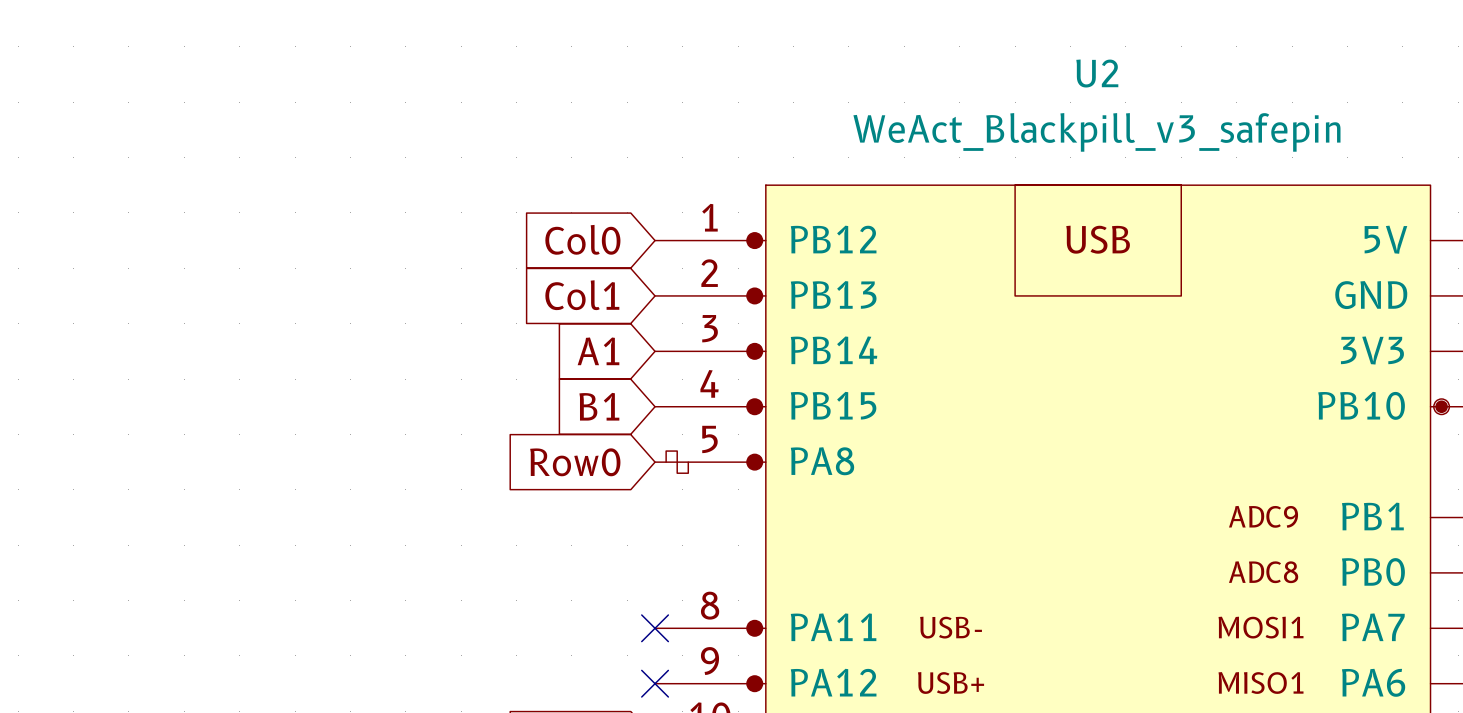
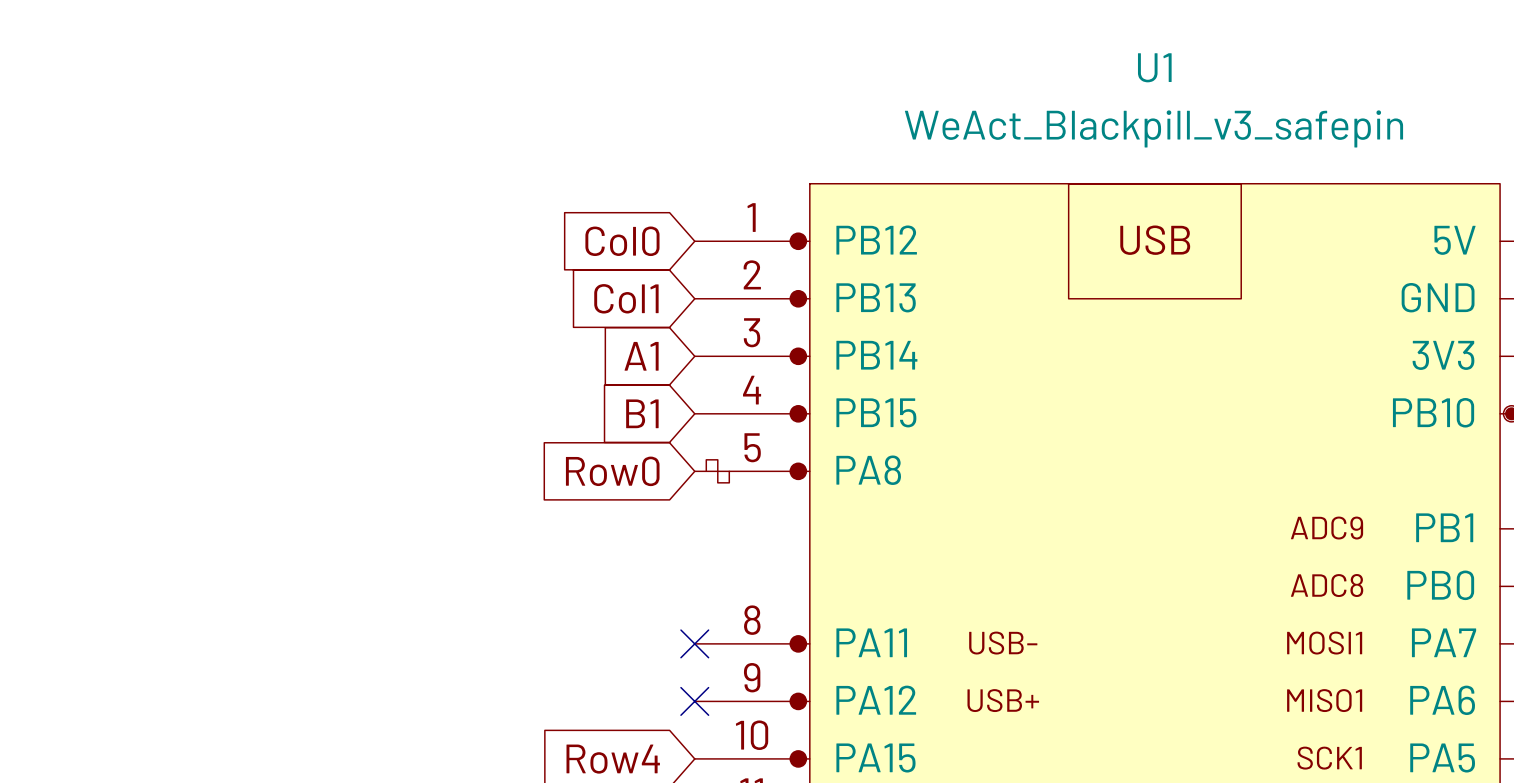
U2 name: U2 (1097, 73) -> U1 (1154, 67)

